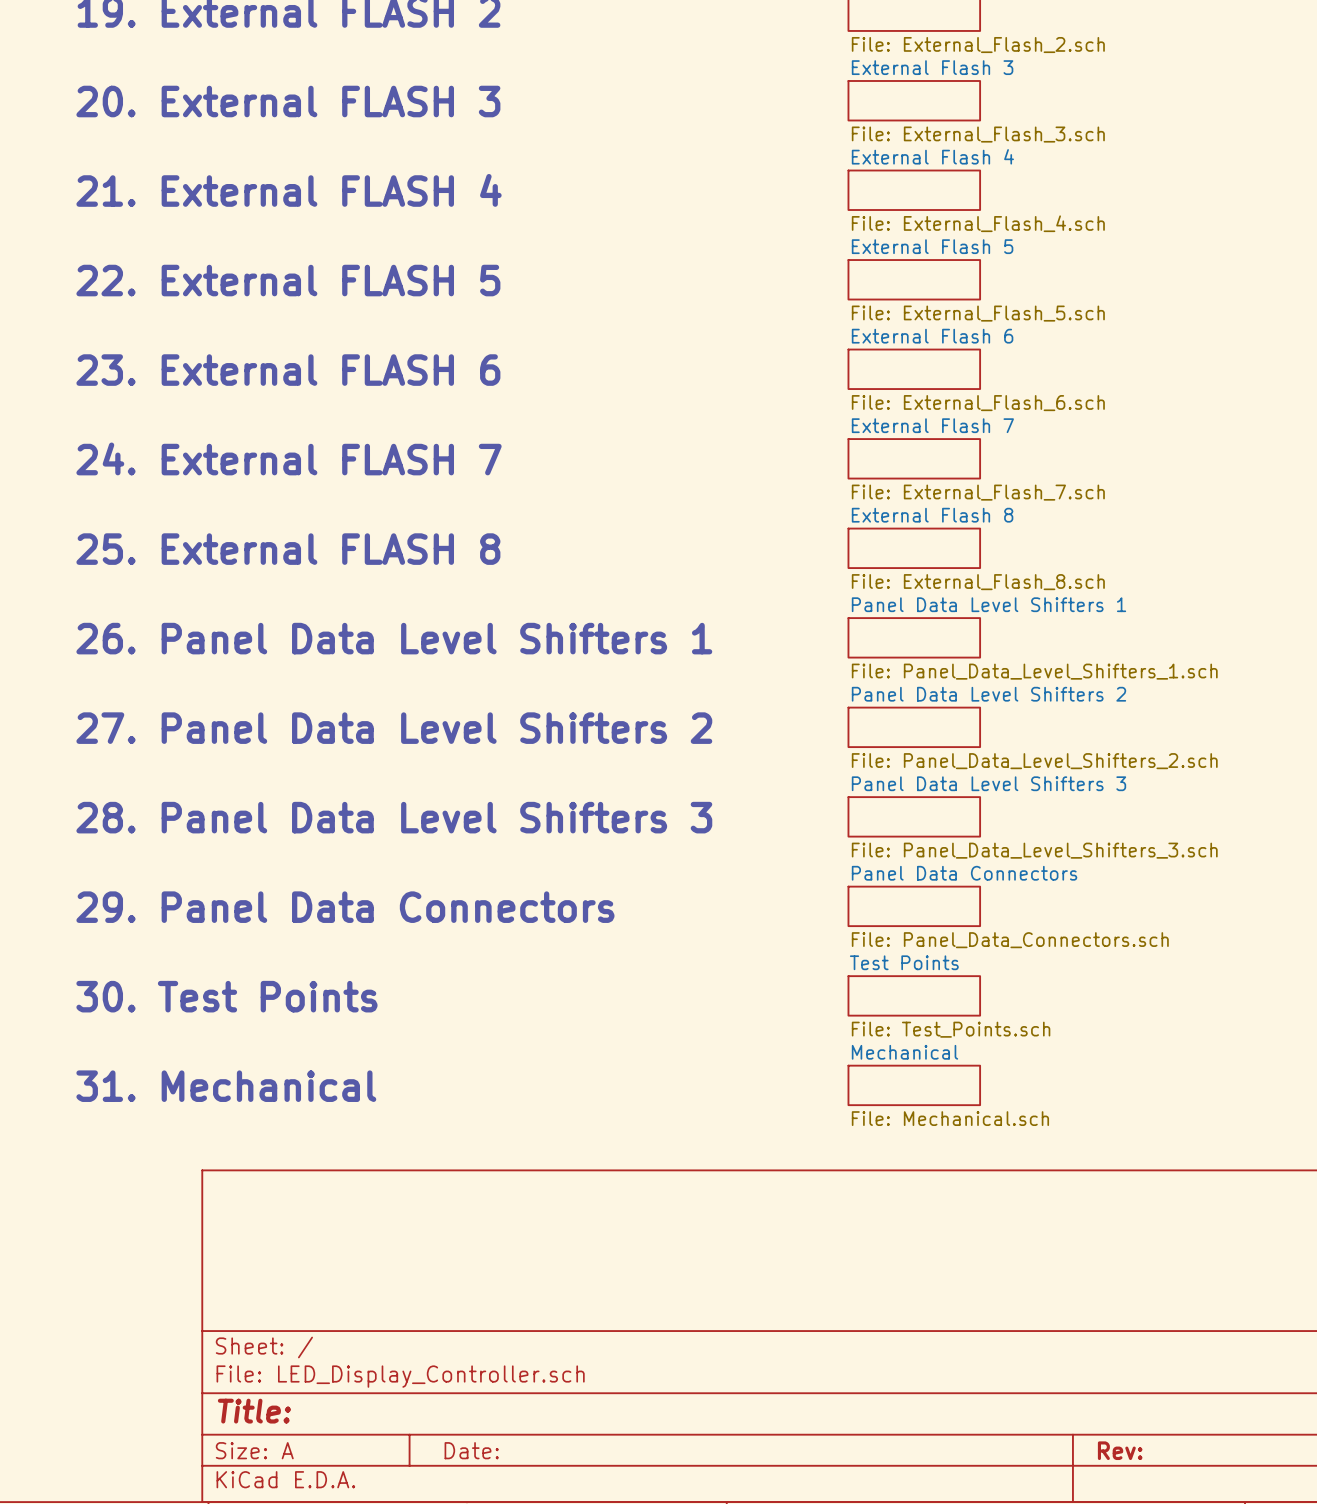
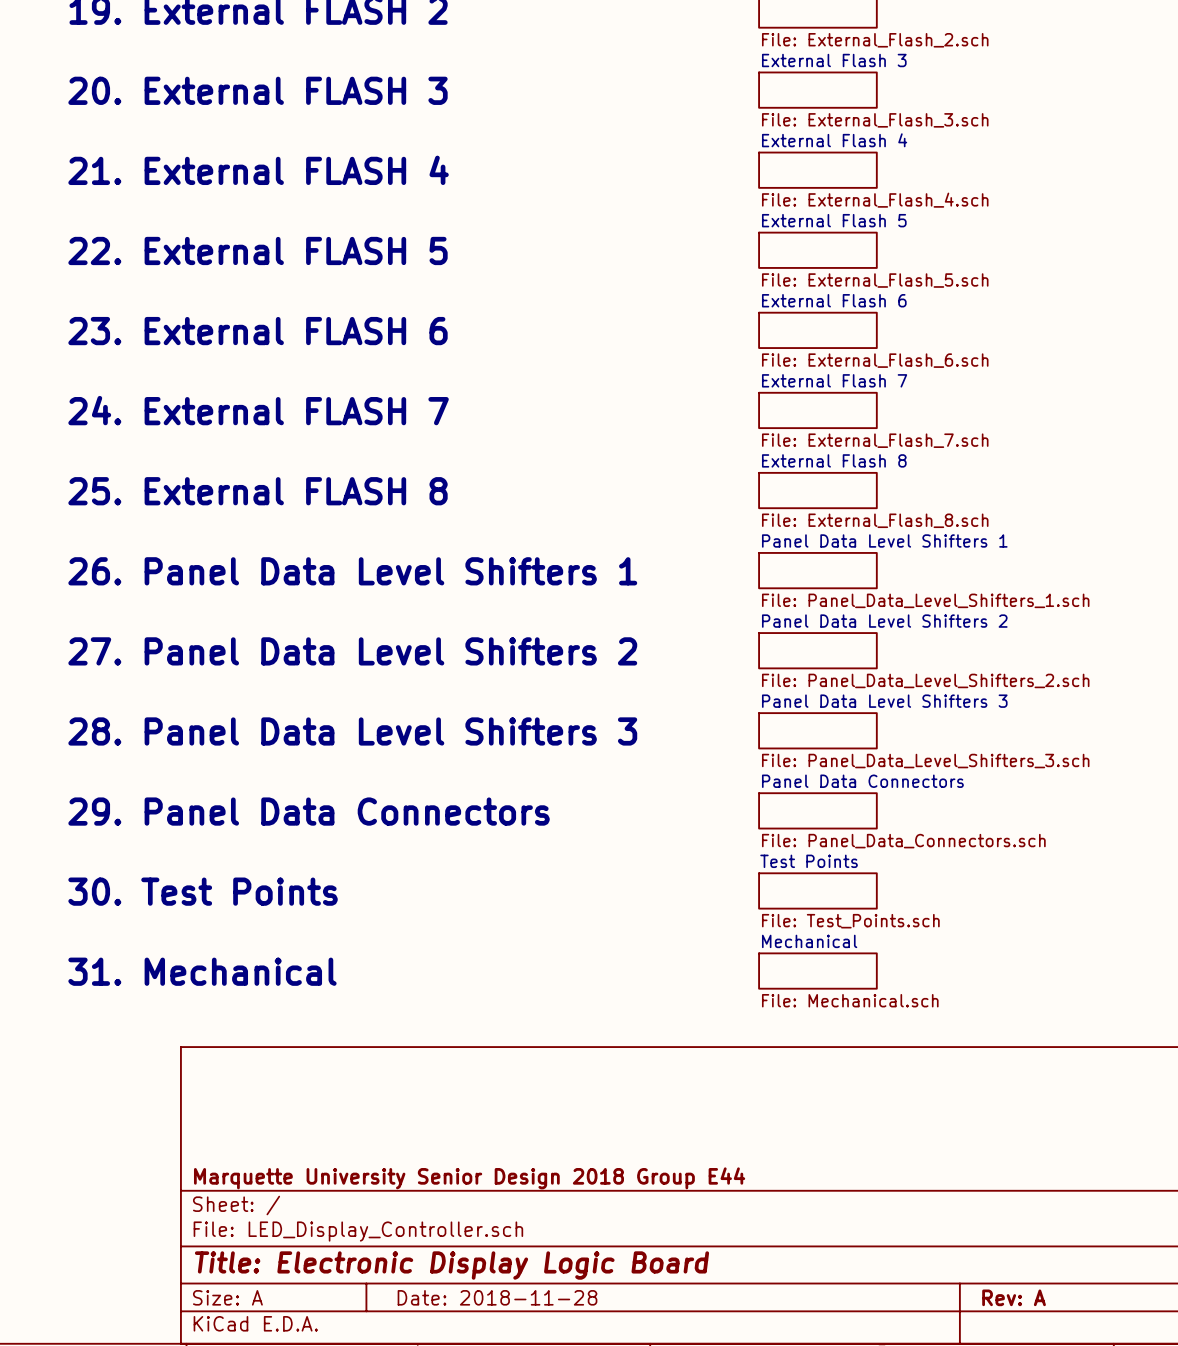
title block: none -> Marquette University Senior Design 2018 Group E44 (469, 1178)
title block: Title: (254, 1411) -> Title: Electronic Display Logic Board (451, 1265)
title block: Date: (471, 1450) -> Date: 2018-11-28 (497, 1297)
title block: Rev: (1120, 1450) -> Rev: A (1014, 1297)

